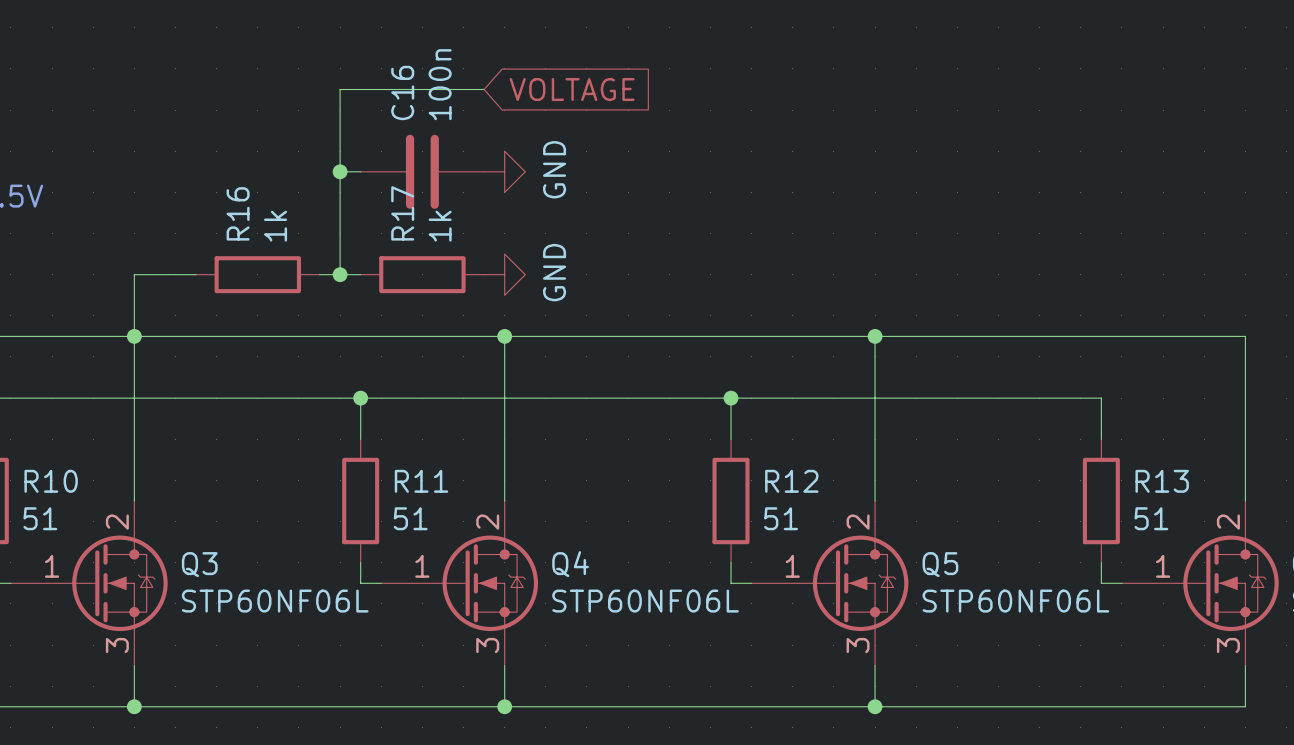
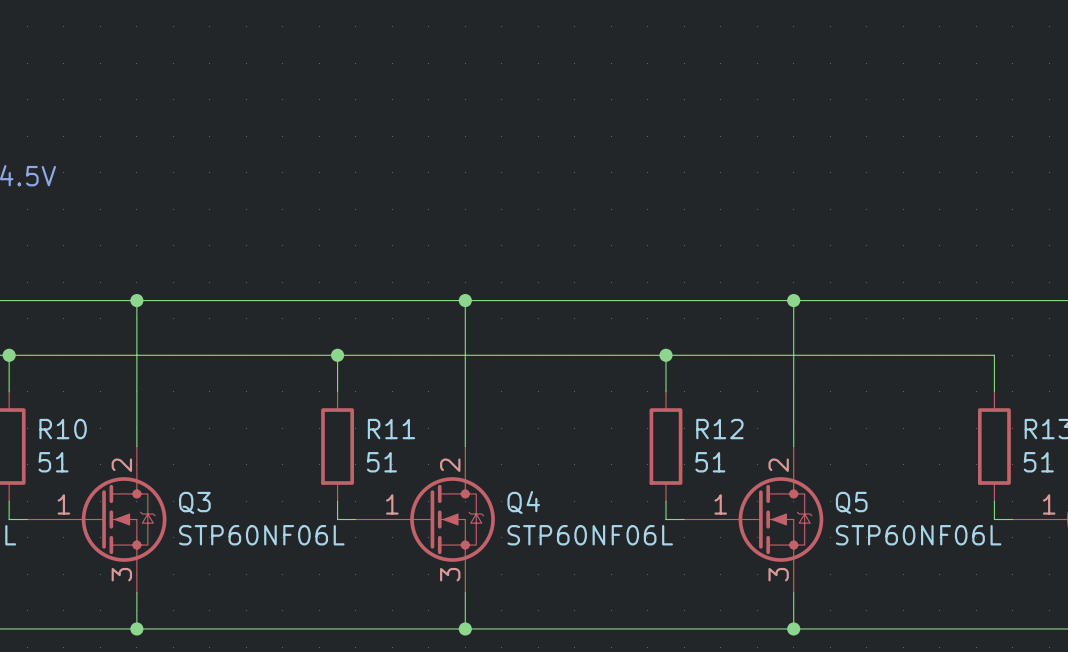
wire: (484, 89) (340, 89) (340, 274) -> none
global label: VOLTAGE (572, 89) -> none
wire: (340, 171) (360, 171) -> none
junction: (340, 171) -> none
C16: 100n (422, 171) -> none
power symbol: GND (504, 171) -> none
wire: (196, 274) (134, 274) (134, 336) -> none
R16: 1k (257, 274) -> none
wire: (319, 274) (360, 274) -> none
junction: (340, 274) -> none
R17: 1k (422, 274) -> none
power symbol: GND (504, 274) -> none

